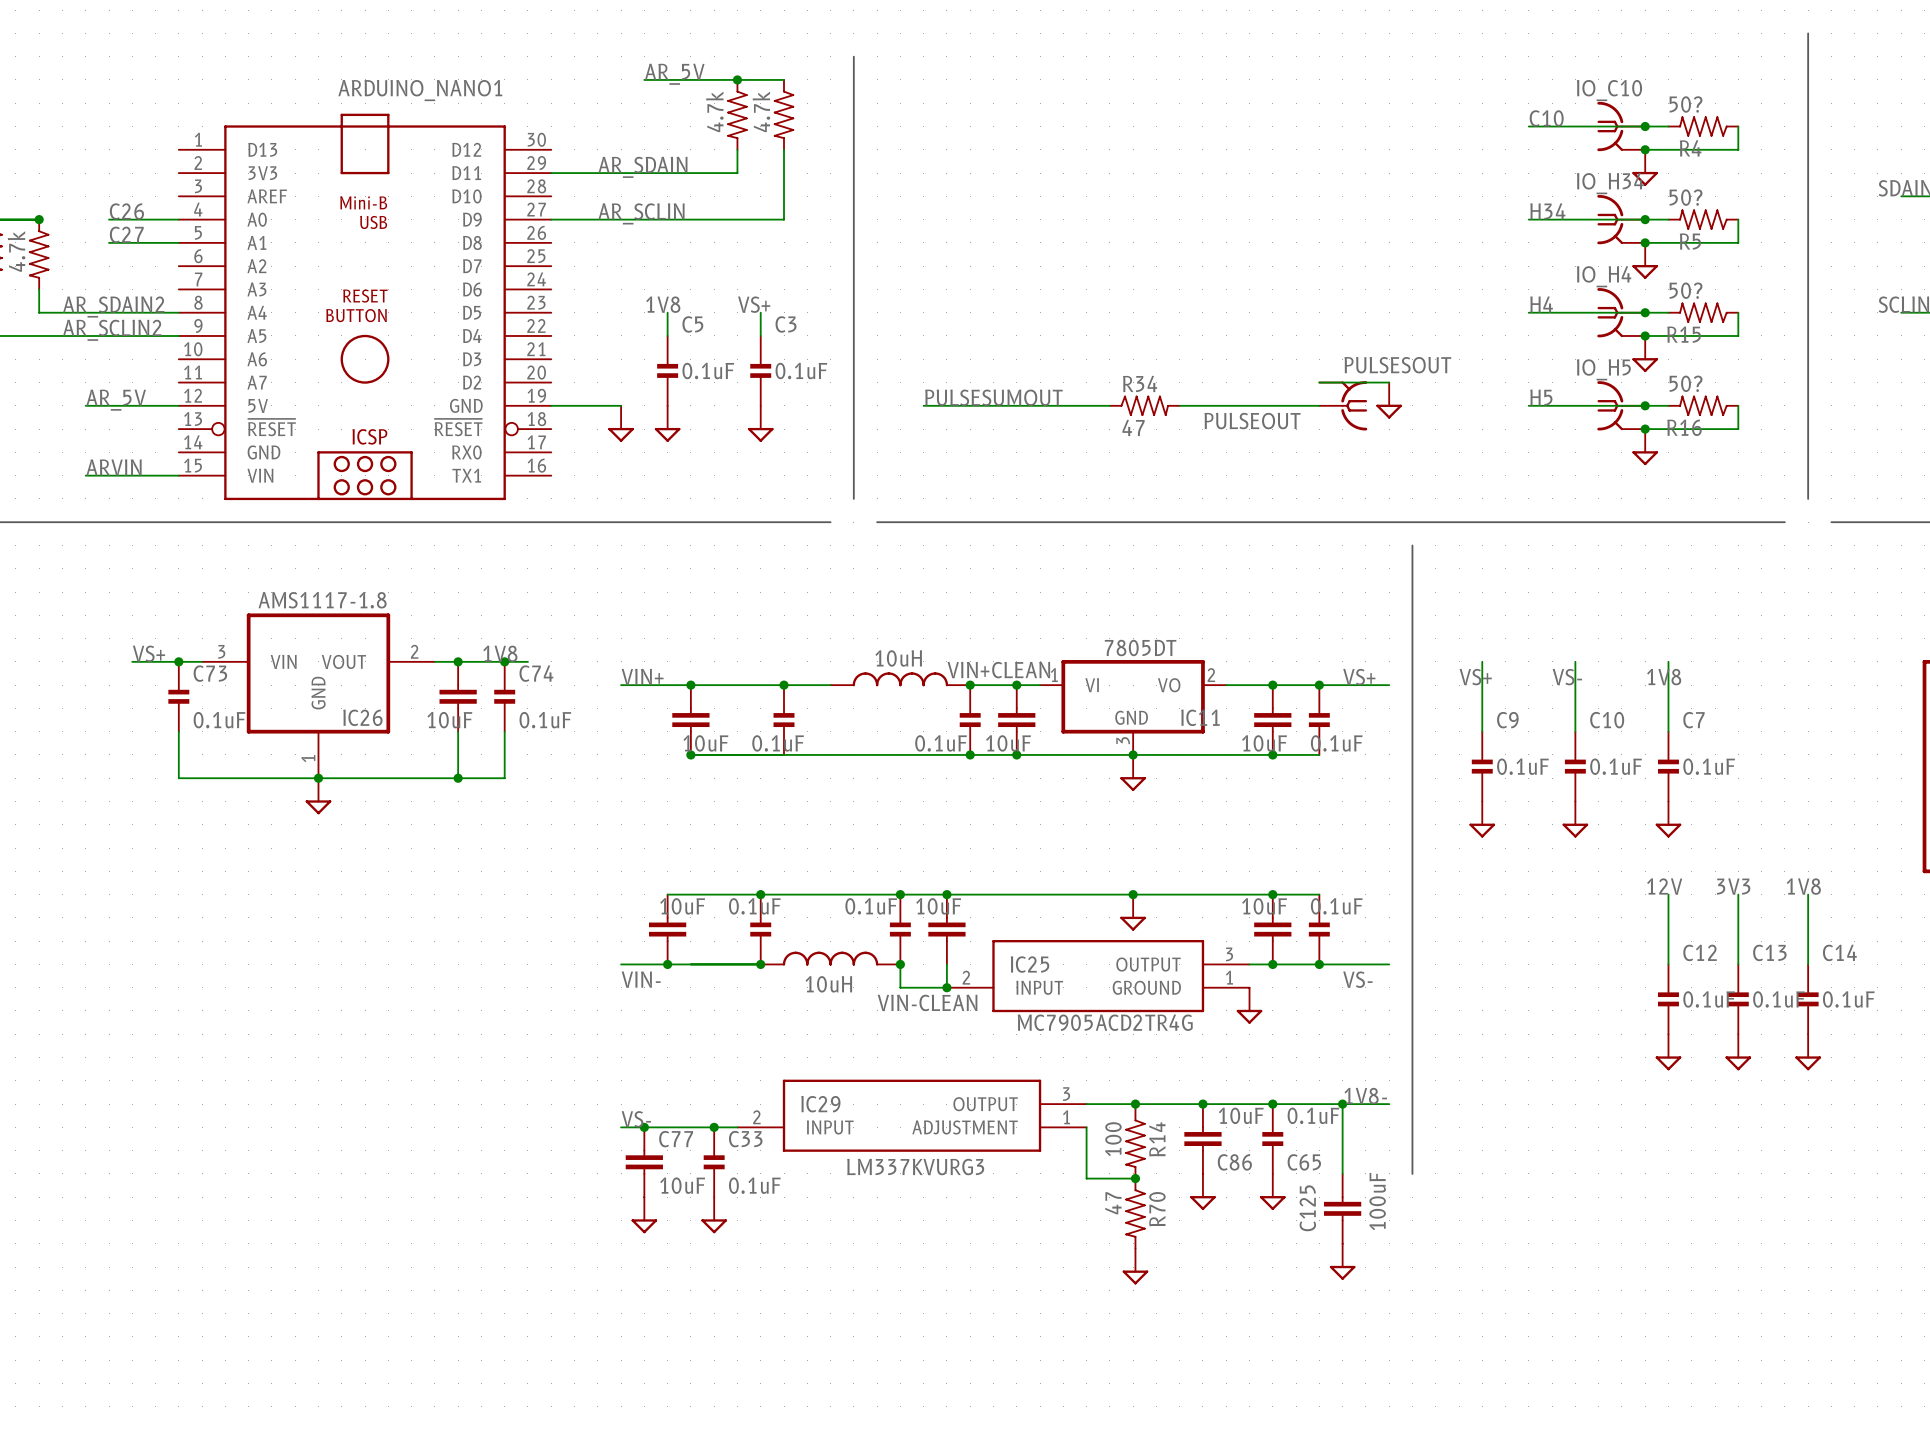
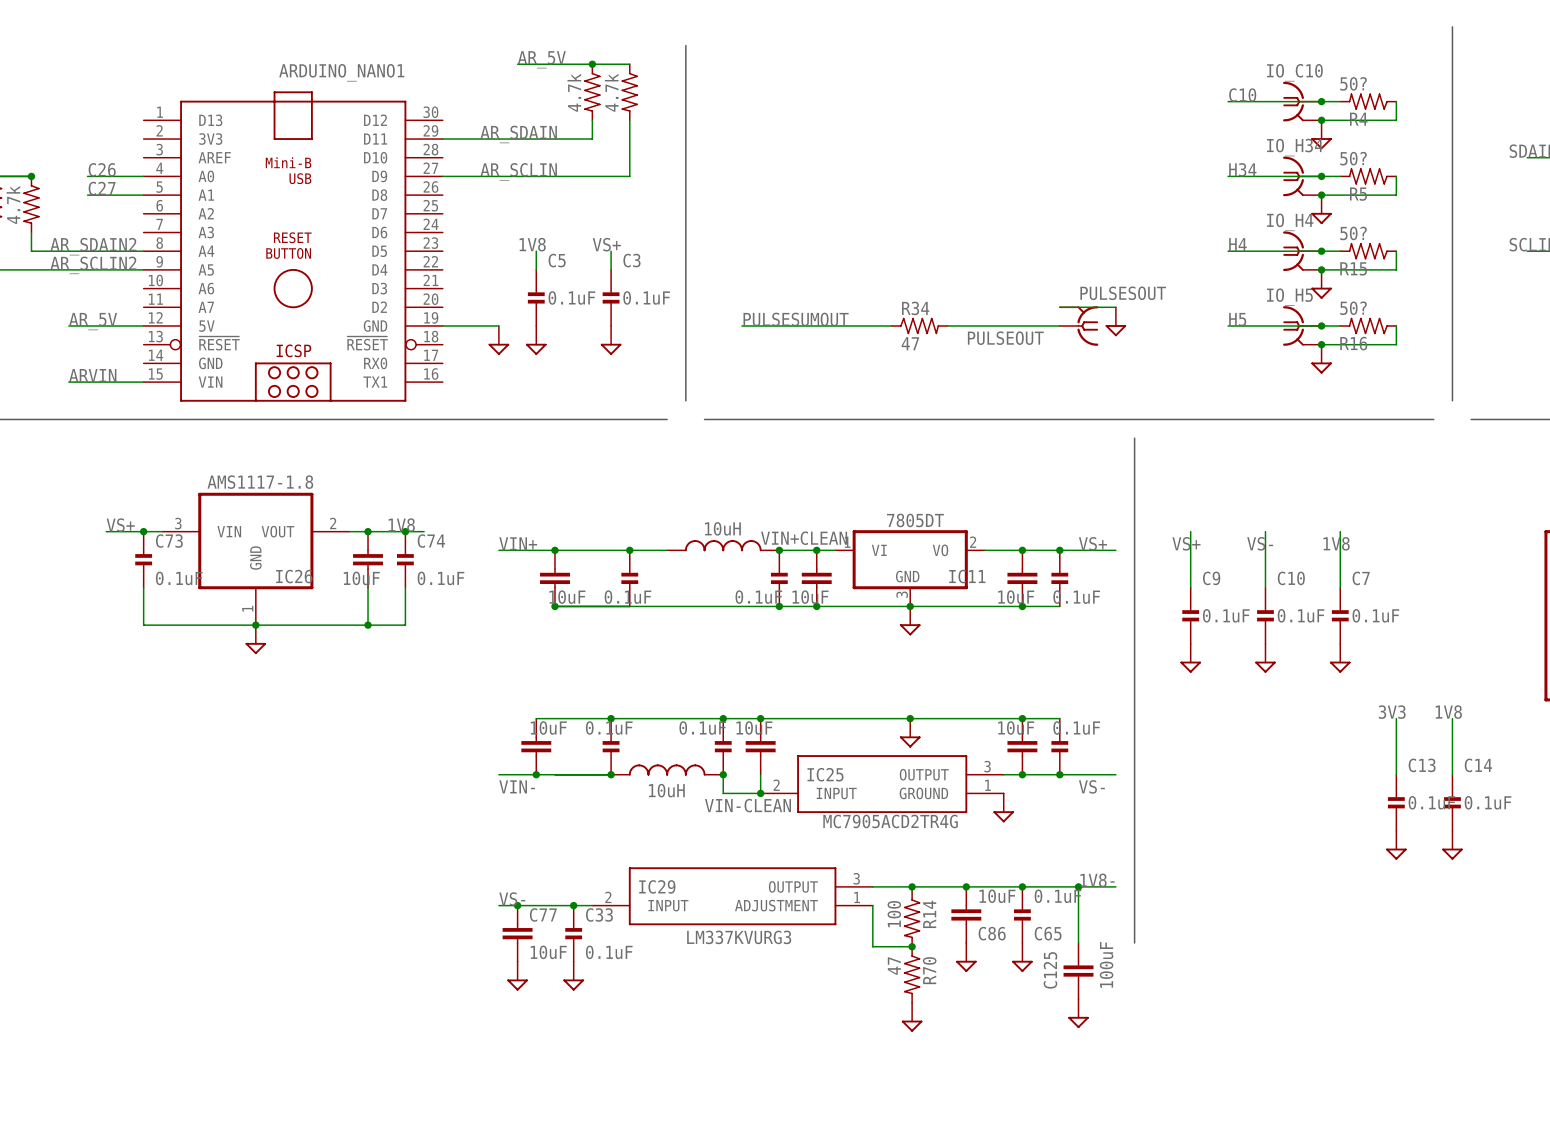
label: 12V (1664, 886) -> none
wire: (1668, 894) (1668, 964) -> none
C12: 0.1uF (1668, 999) -> none
power symbol: (1668, 1052) -> none

